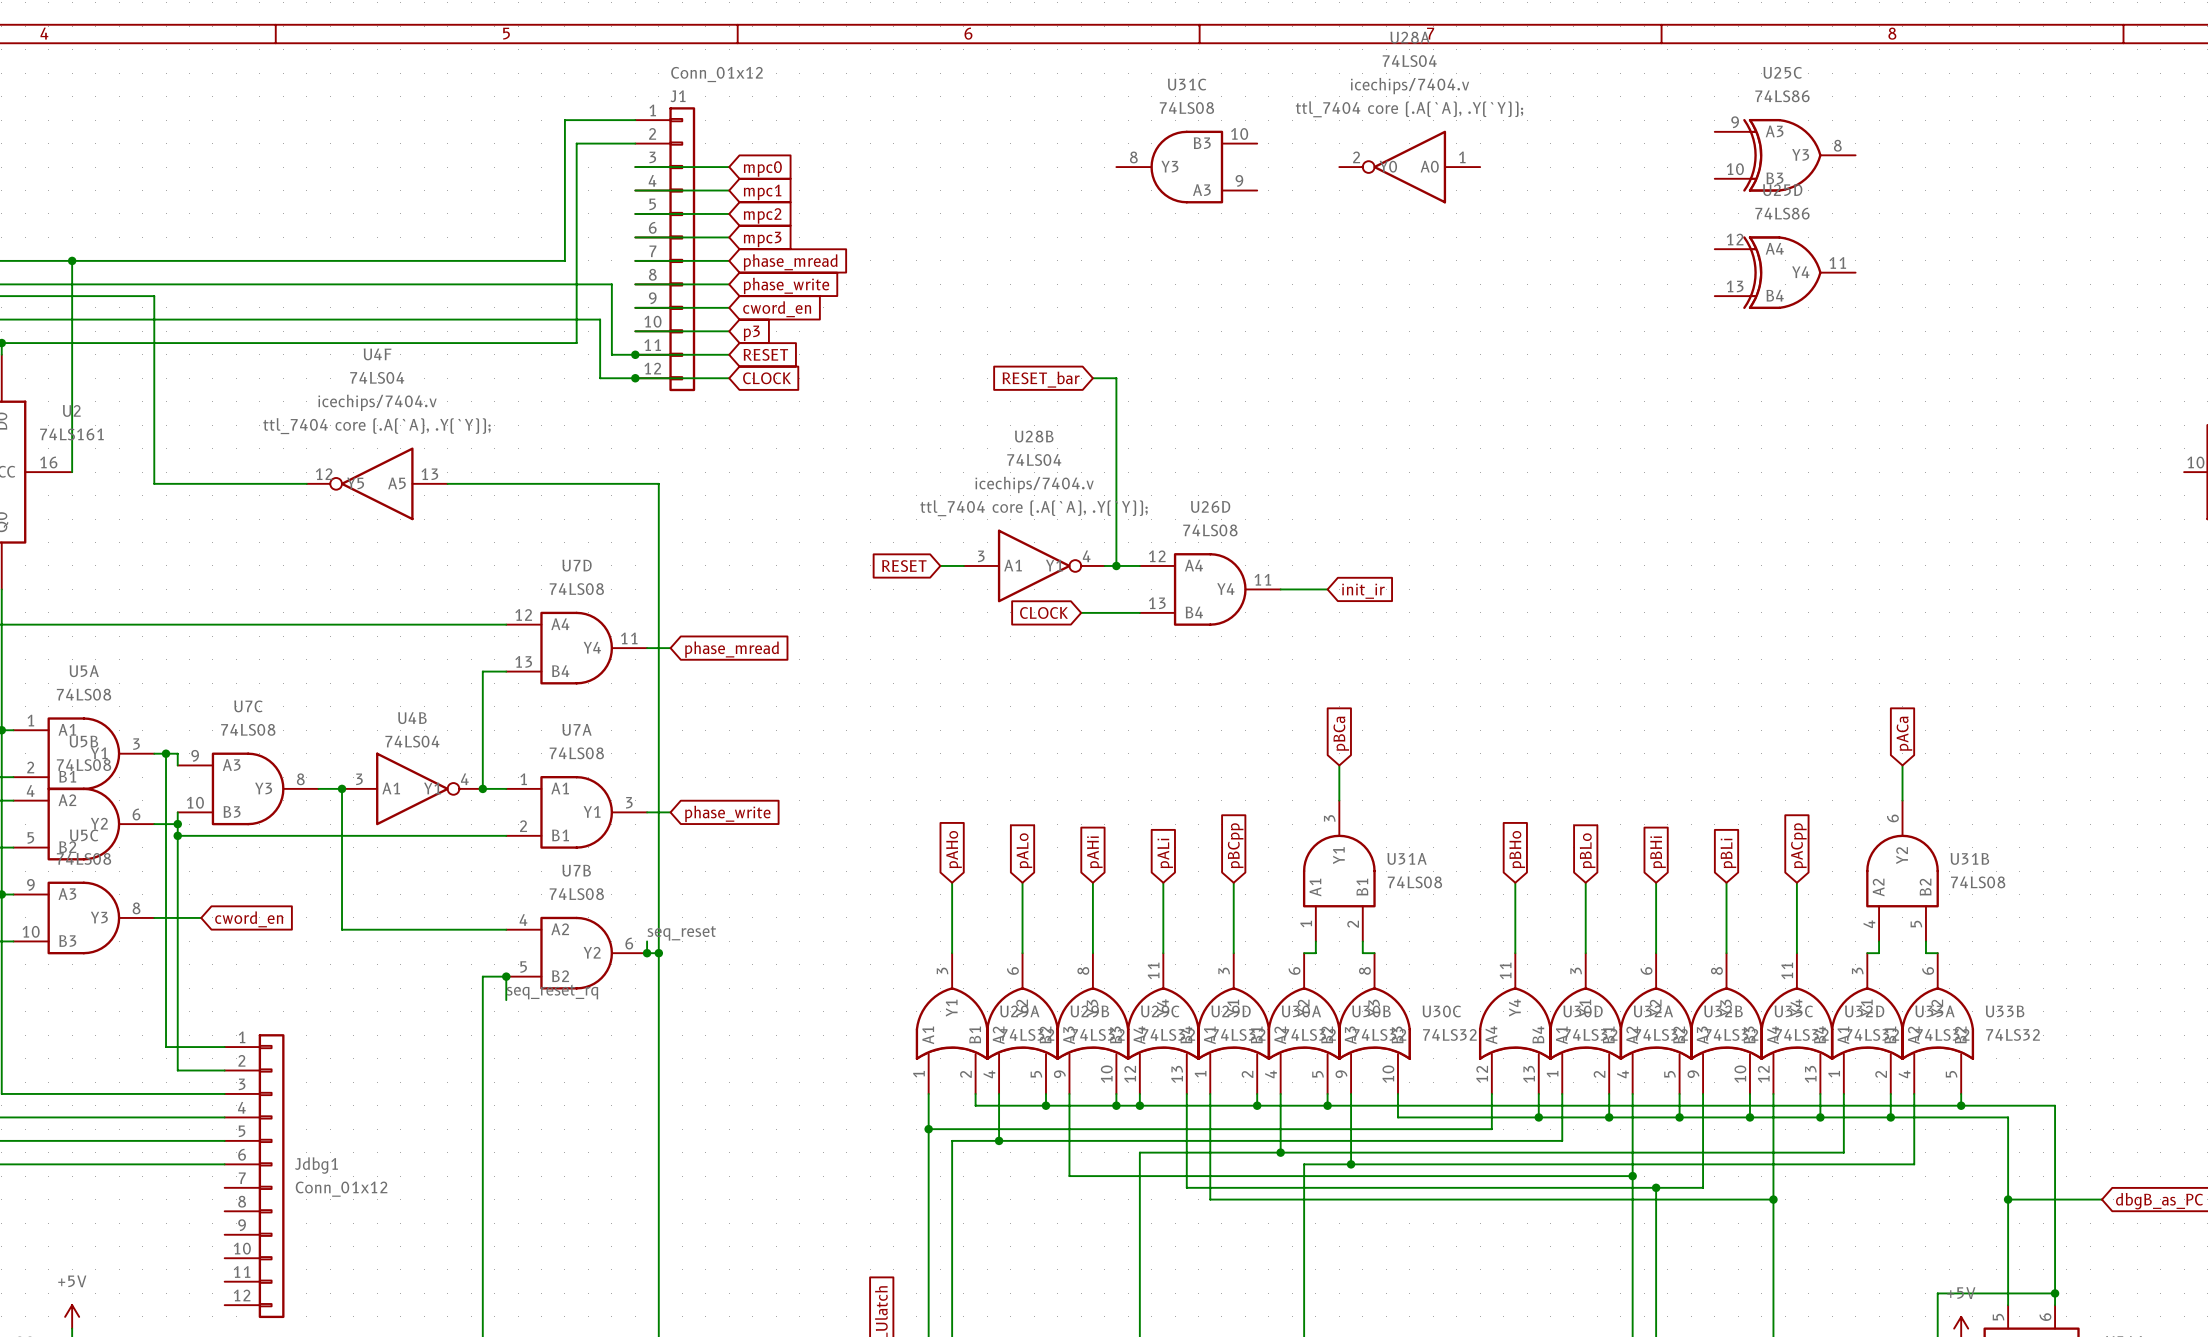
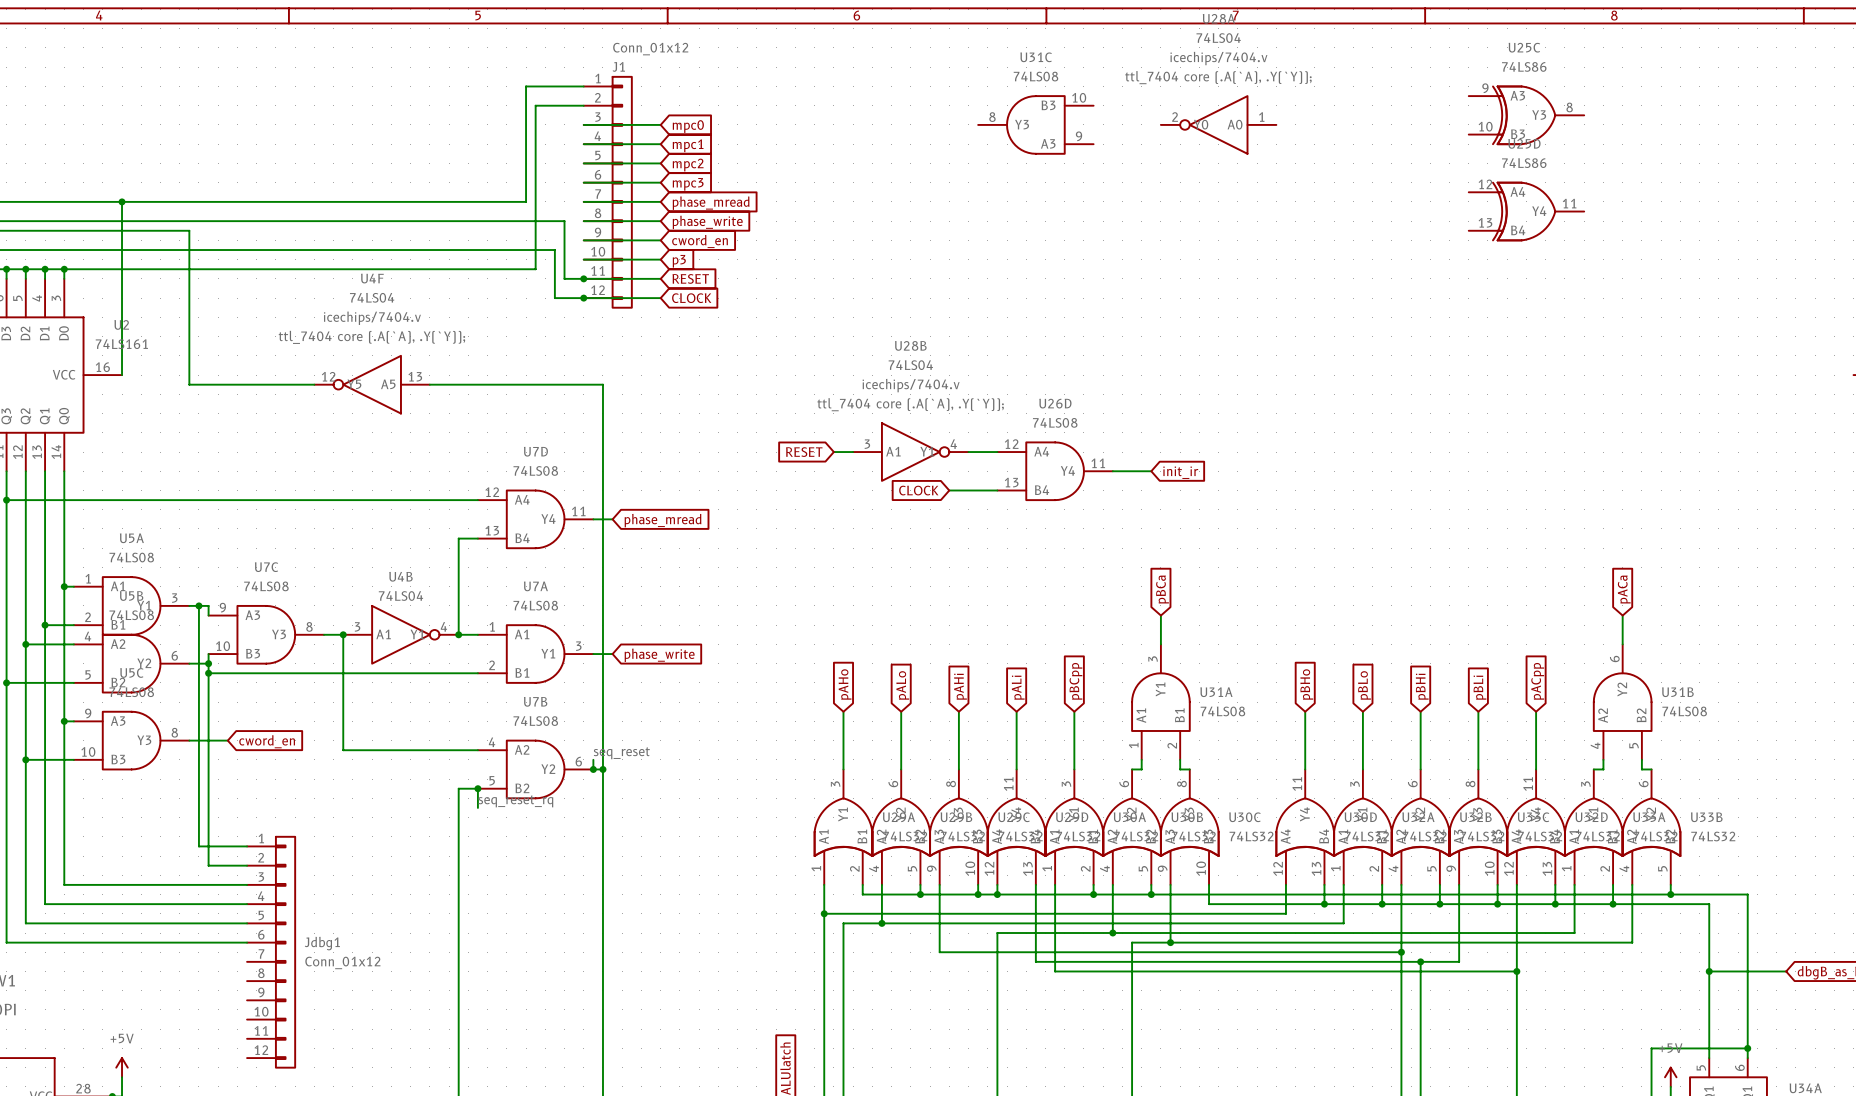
wire: (1092, 378) (1116, 378) (1116, 565) -> none
global label: RESET_bar (1041, 379) -> none
junction: (1116, 565) -> none

